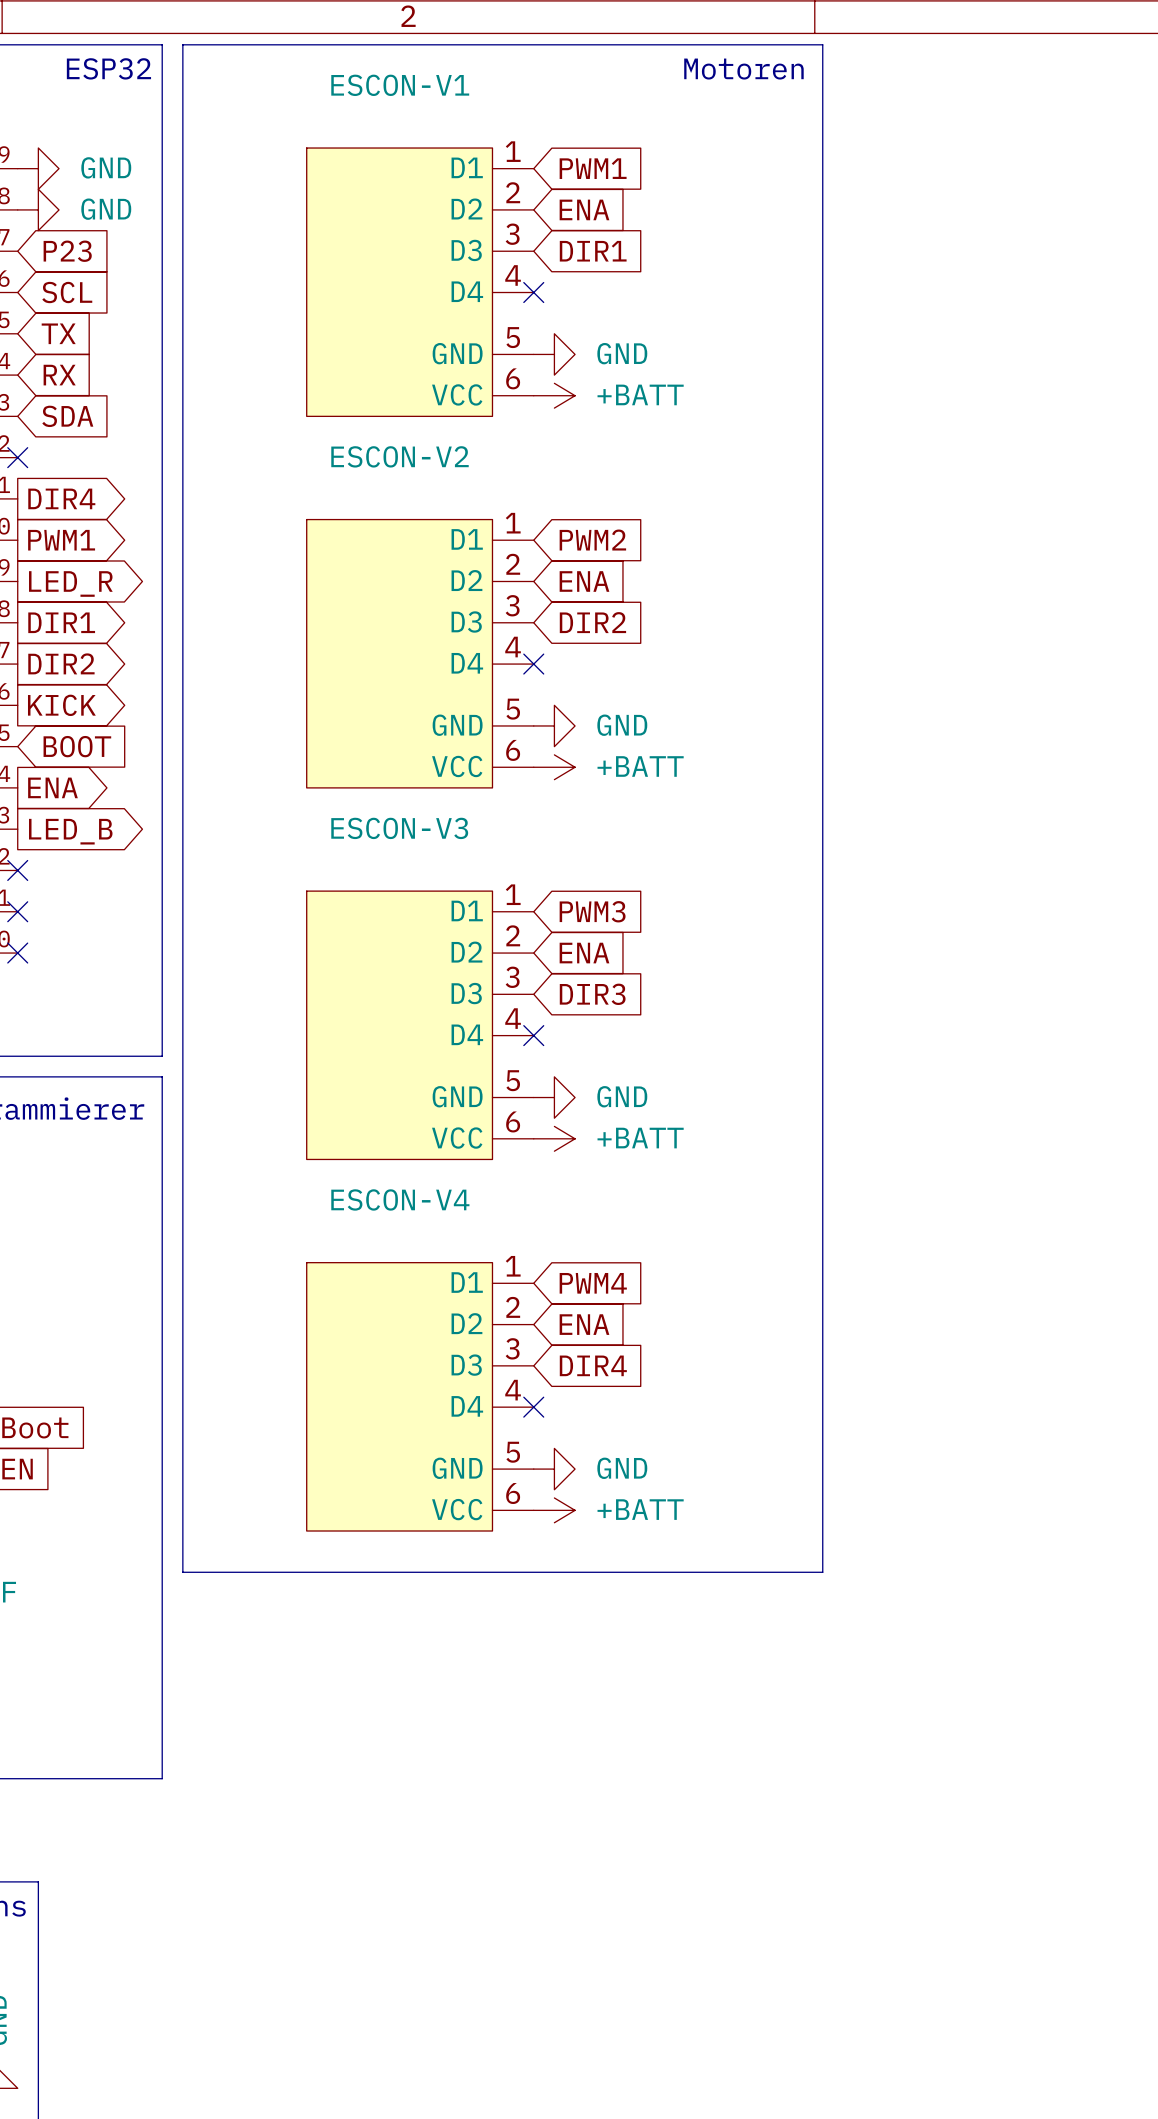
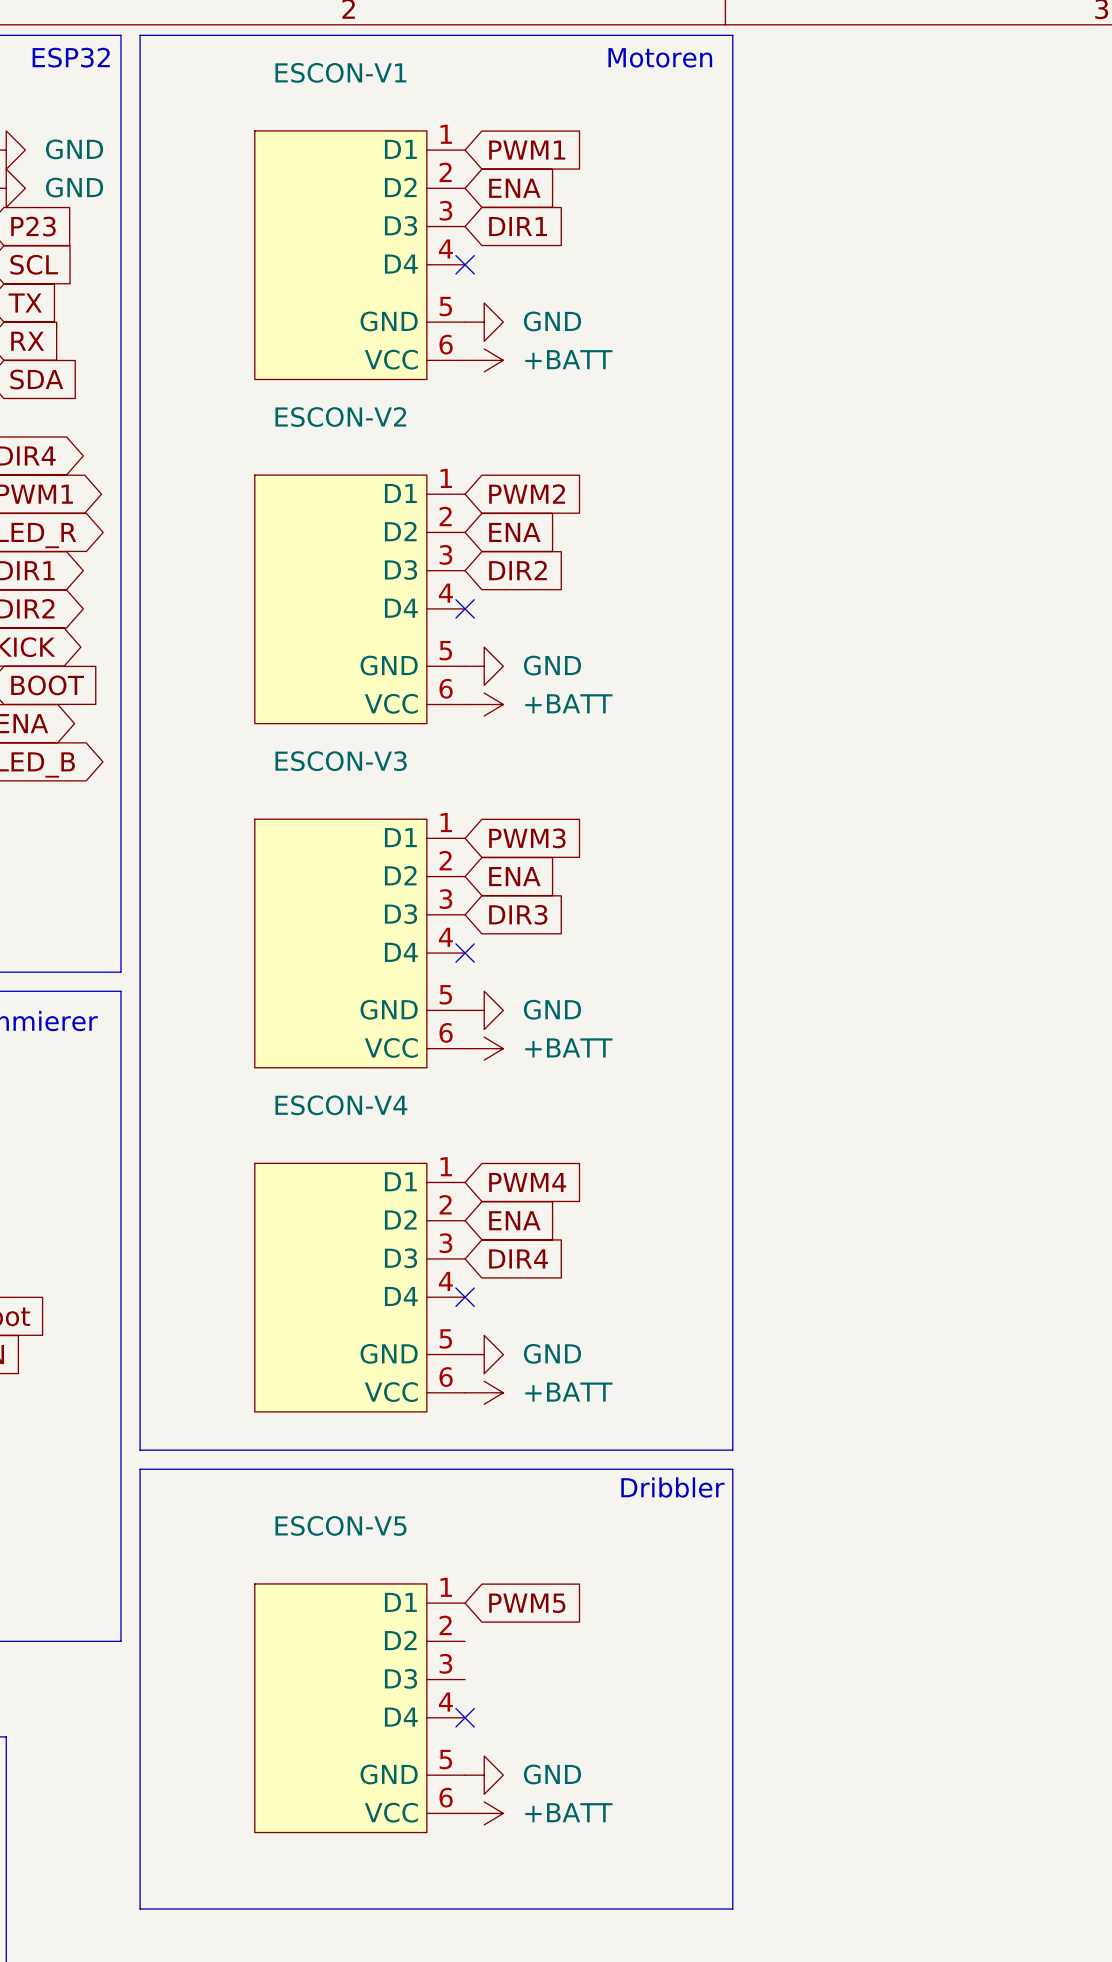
line: none -> (140, 1469) (732, 1469) (732, 1909) (140, 1909) (140, 1469)
text: none -> Dribbler (672, 1487)
global label: none -> PWM5 (527, 1603)
ESCON-V5: none -> (359, 1708)
no-connect mark: none -> (465, 1717)
power symbol: none -> GND (484, 1775)
power symbol: none -> +BATT (484, 1813)

